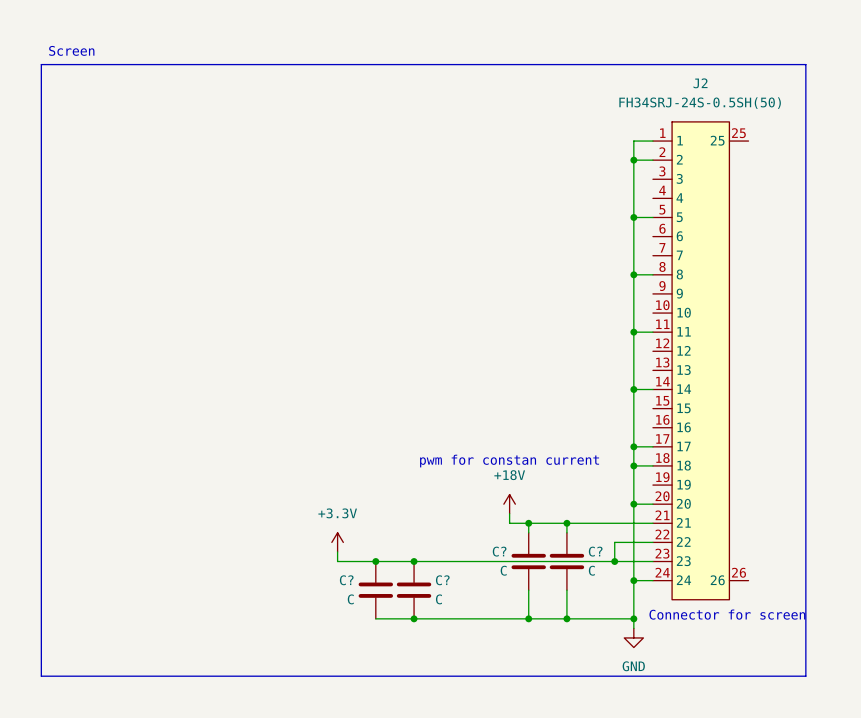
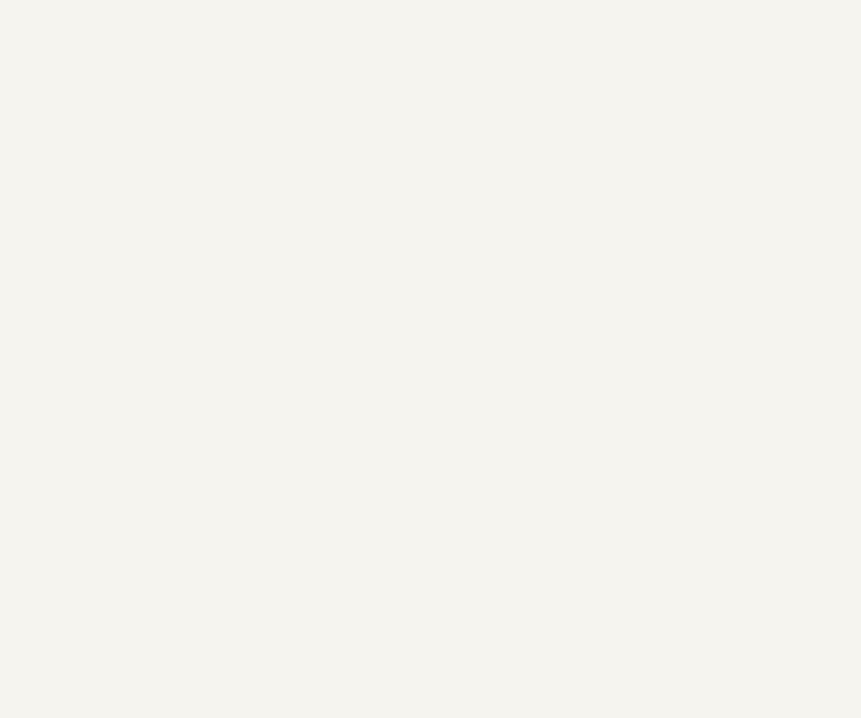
text: Screen (71, 50) -> none
line: (41, 64) (805, 64) (805, 676) (41, 676) (41, 64) -> none
wire: (652, 141) (633, 141) (633, 628) -> none
wire: (633, 160) (652, 160) -> none
junction: (633, 160) -> none
wire: (633, 217) (652, 217) -> none
junction: (633, 217) -> none
wire: (633, 274) (652, 274) -> none
junction: (633, 274) -> none
wire: (633, 332) (652, 332) -> none
junction: (633, 332) -> none
J2: FH34SRJ-24S-0.5SH(50) (700, 360) -> none
wire: (633, 389) (652, 389) -> none
junction: (633, 389) -> none
wire: (633, 446) (652, 446) -> none
junction: (633, 446) -> none
text: pwm for constan current (509, 461) -> none
wire: (633, 465) (652, 465) -> none
junction: (633, 465) -> none
power symbol: +18V (509, 504) -> none
wire: (633, 504) (652, 504) -> none
junction: (633, 504) -> none
wire: (509, 513) (509, 523) (652, 523) -> none
wire: (528, 523) (528, 532) -> none
junction: (528, 523) -> none
wire: (566, 523) (566, 532) -> none
junction: (566, 523) -> none
power symbol: +3.3V (337, 542) -> none
wire: (652, 542) (614, 542) (614, 561) -> none
wire: (337, 551) (337, 561) (652, 561) -> none
junction: (375, 561) -> none
junction: (414, 561) -> none
C?: C (528, 561) -> none
C?: C (566, 561) -> none
junction: (614, 561) -> none
wire: (633, 580) (652, 580) -> none
junction: (633, 580) -> none
C?: C (375, 590) -> none
C?: C (414, 590) -> none
wire: (528, 590) (528, 618) -> none
wire: (566, 590) (566, 618) -> none
text: Connector for screen (727, 614) -> none
wire: (375, 618) (633, 618) -> none
junction: (414, 618) -> none
junction: (528, 618) -> none
junction: (566, 618) -> none
junction: (633, 618) -> none
power symbol: GND (633, 637) -> none

